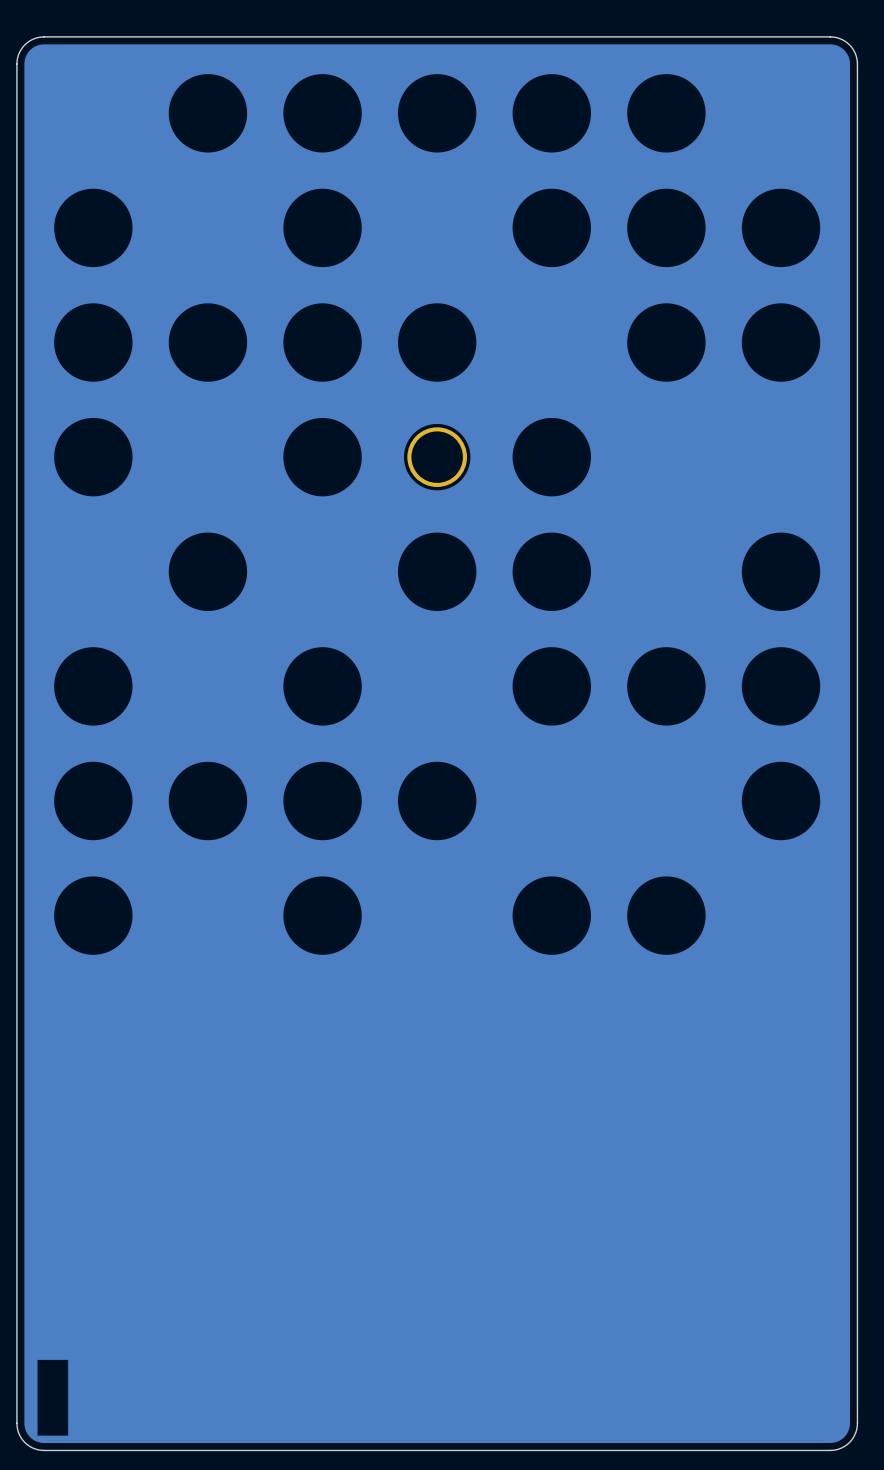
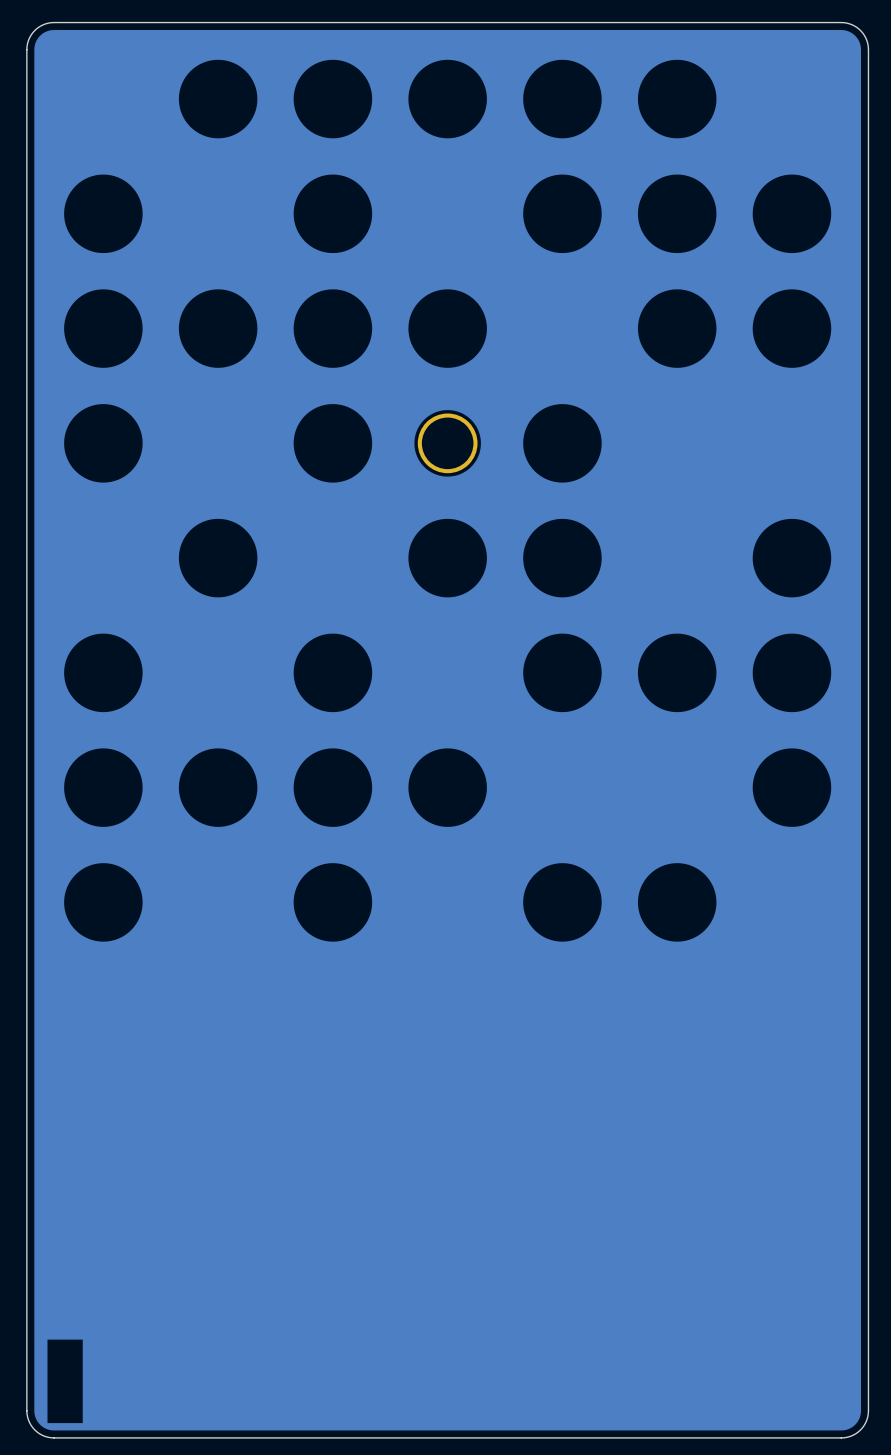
drawing shape: [24, 44, 850, 1444] -> [34, 30, 862, 1431]

